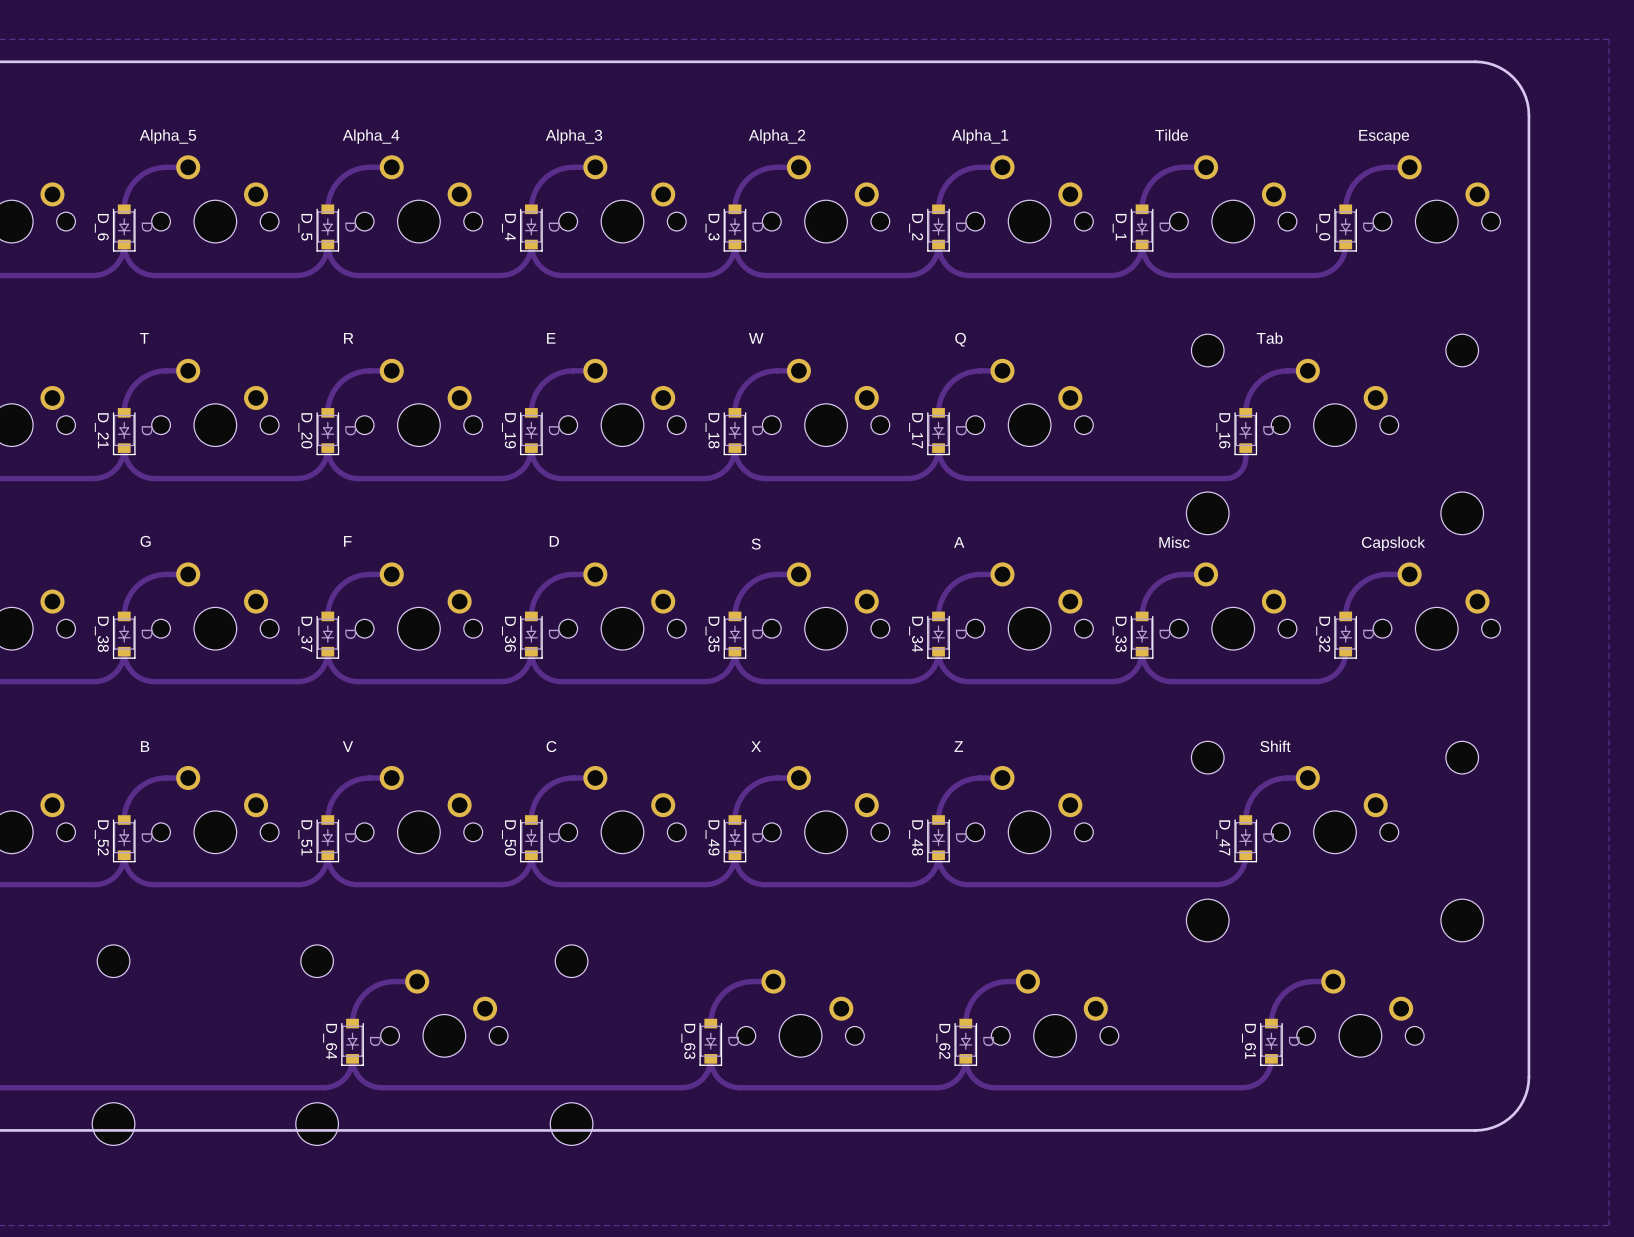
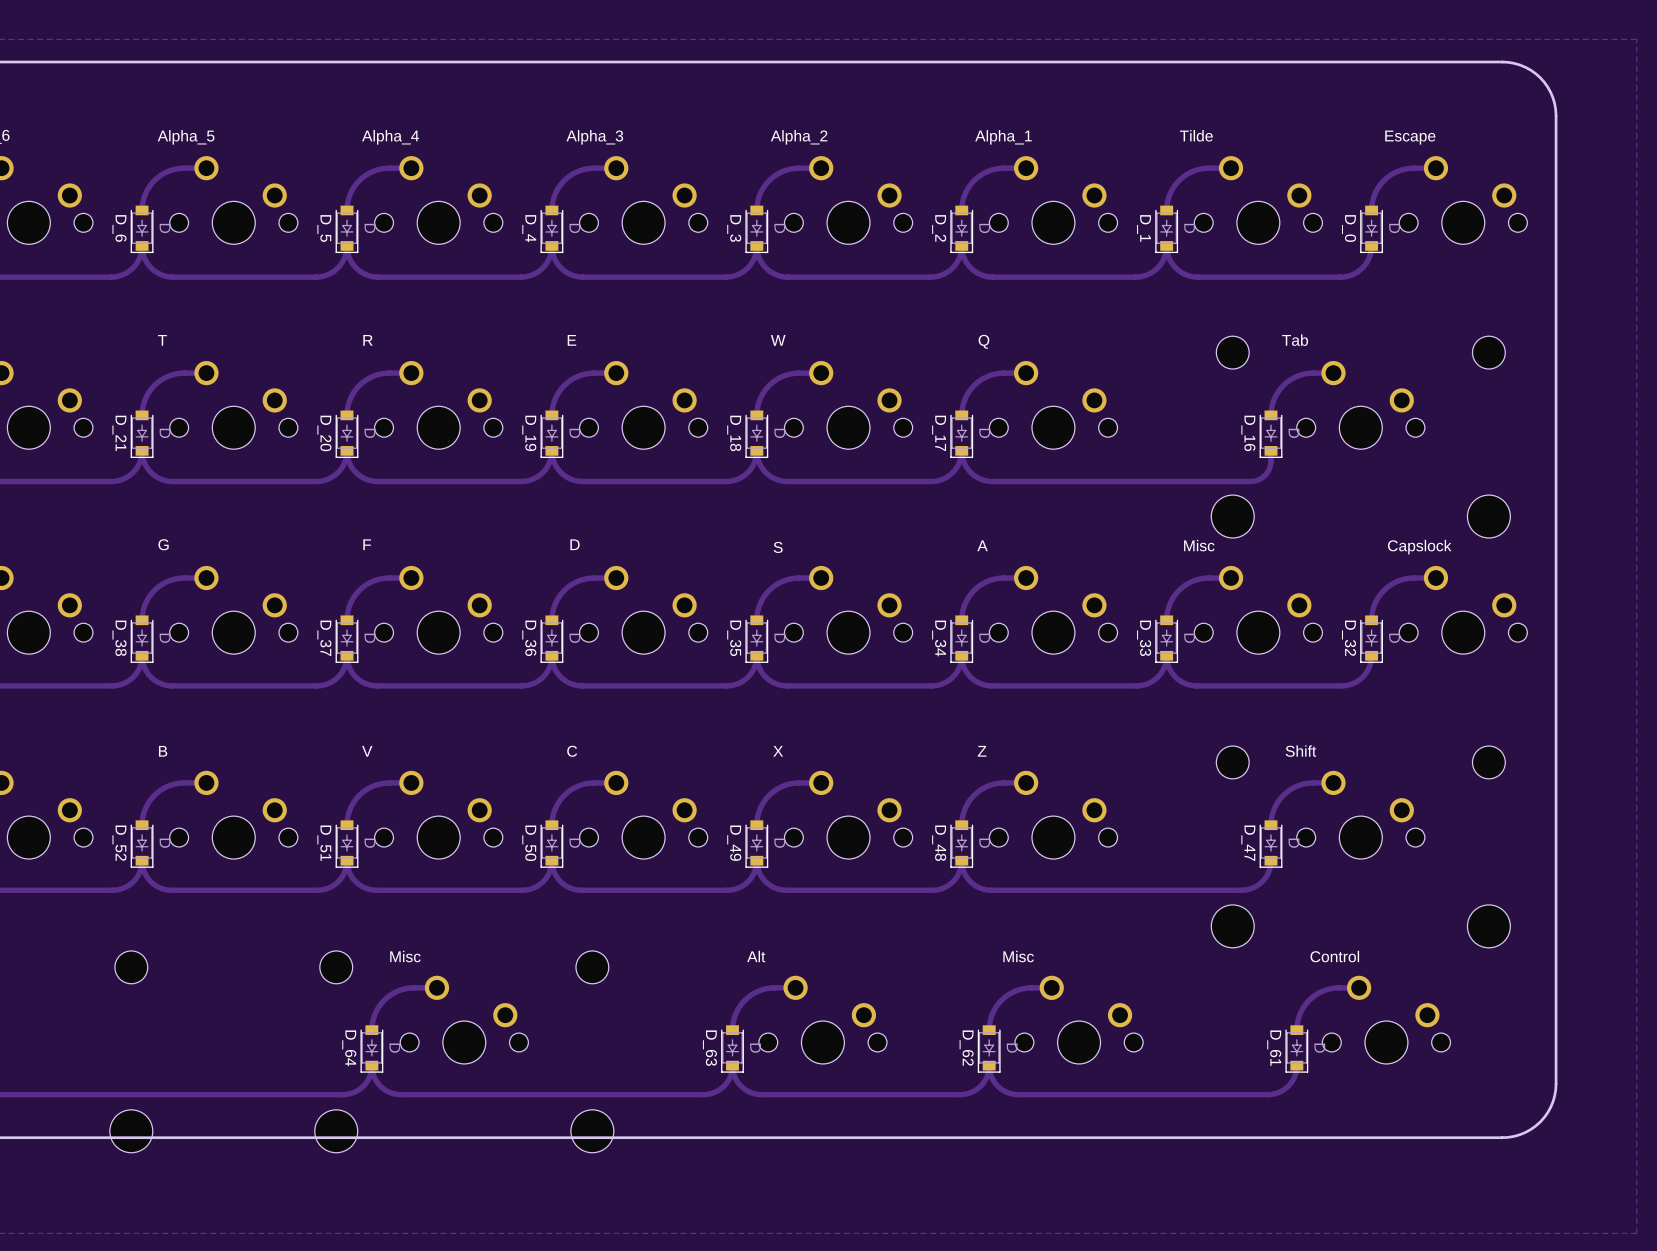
text: none -> Misc (405, 956)
text: none -> Alt (756, 956)
text: none -> Misc (1018, 956)
text: none -> Control (1334, 956)

